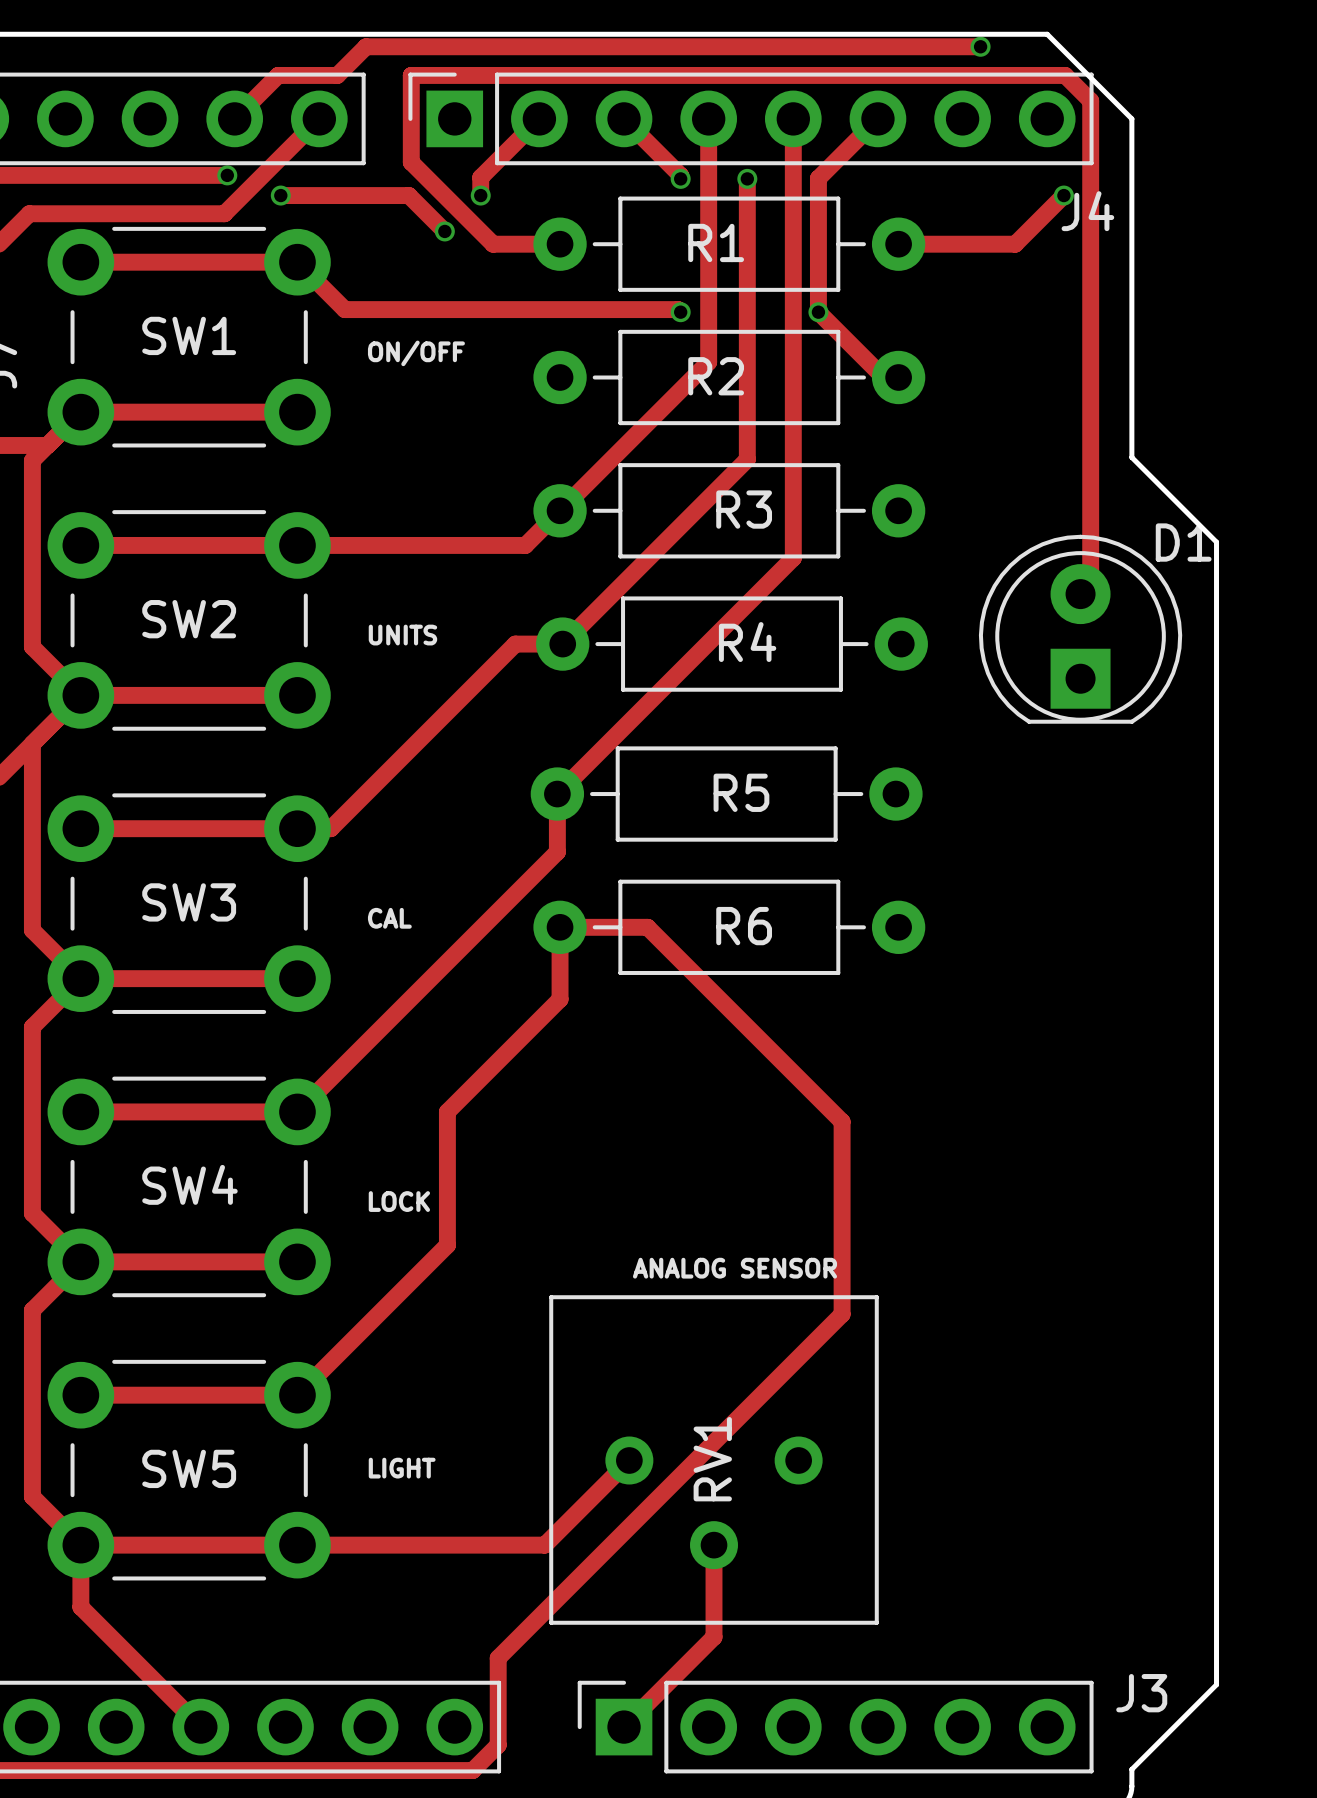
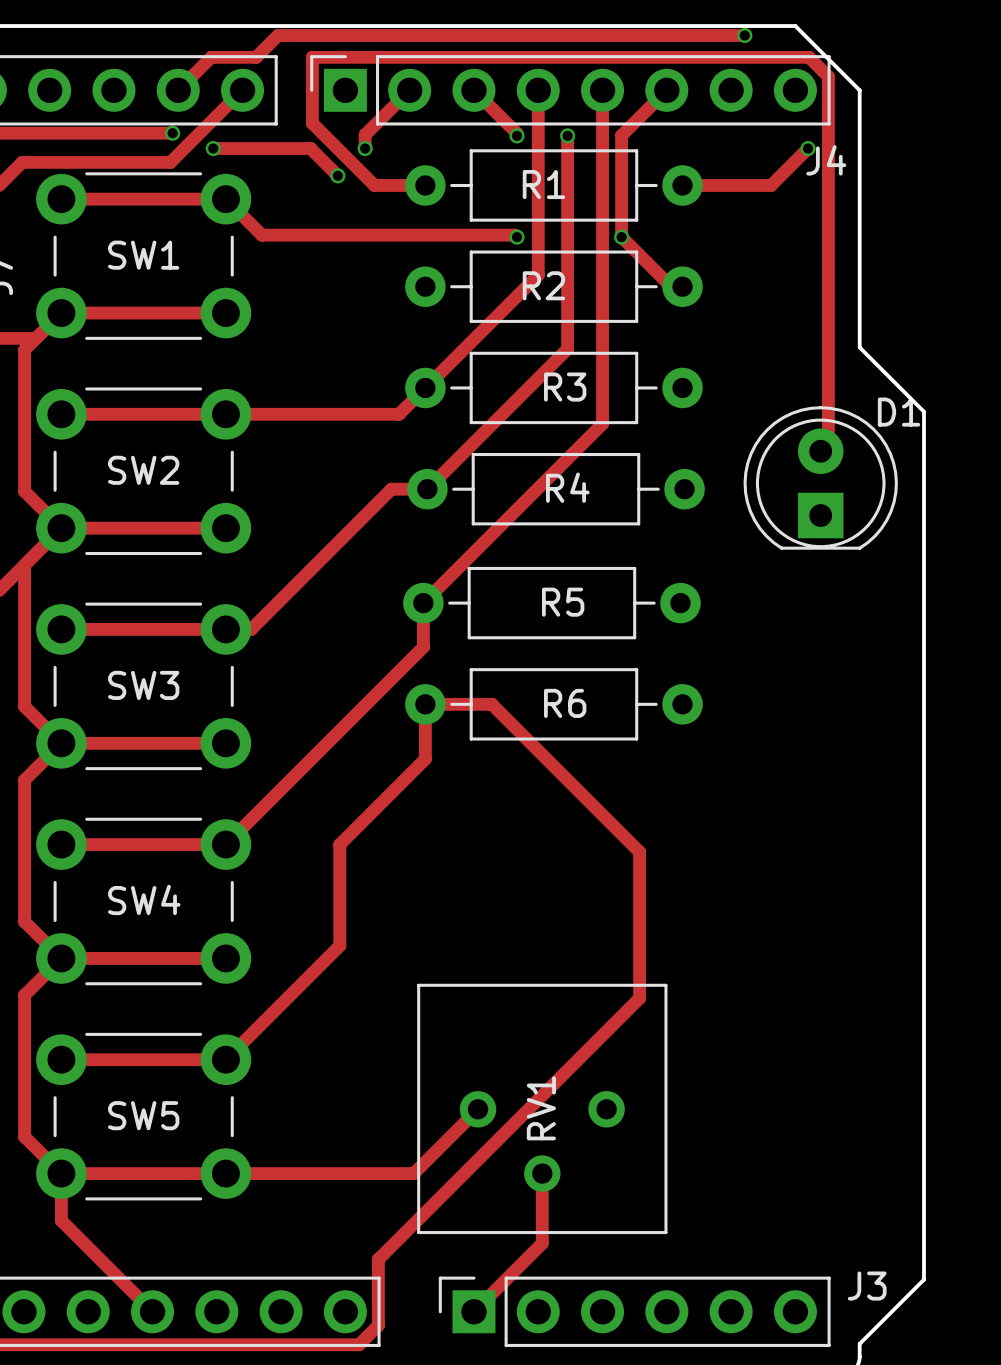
text: ON/OFF (416, 353) -> none
text: UNITS (402, 635) -> none
text: CAL (389, 918) -> none
text: LOCK (399, 1201) -> none
text: ANALOG SENSOR (734, 1268) -> none
text: LIGHT (402, 1468) -> none

